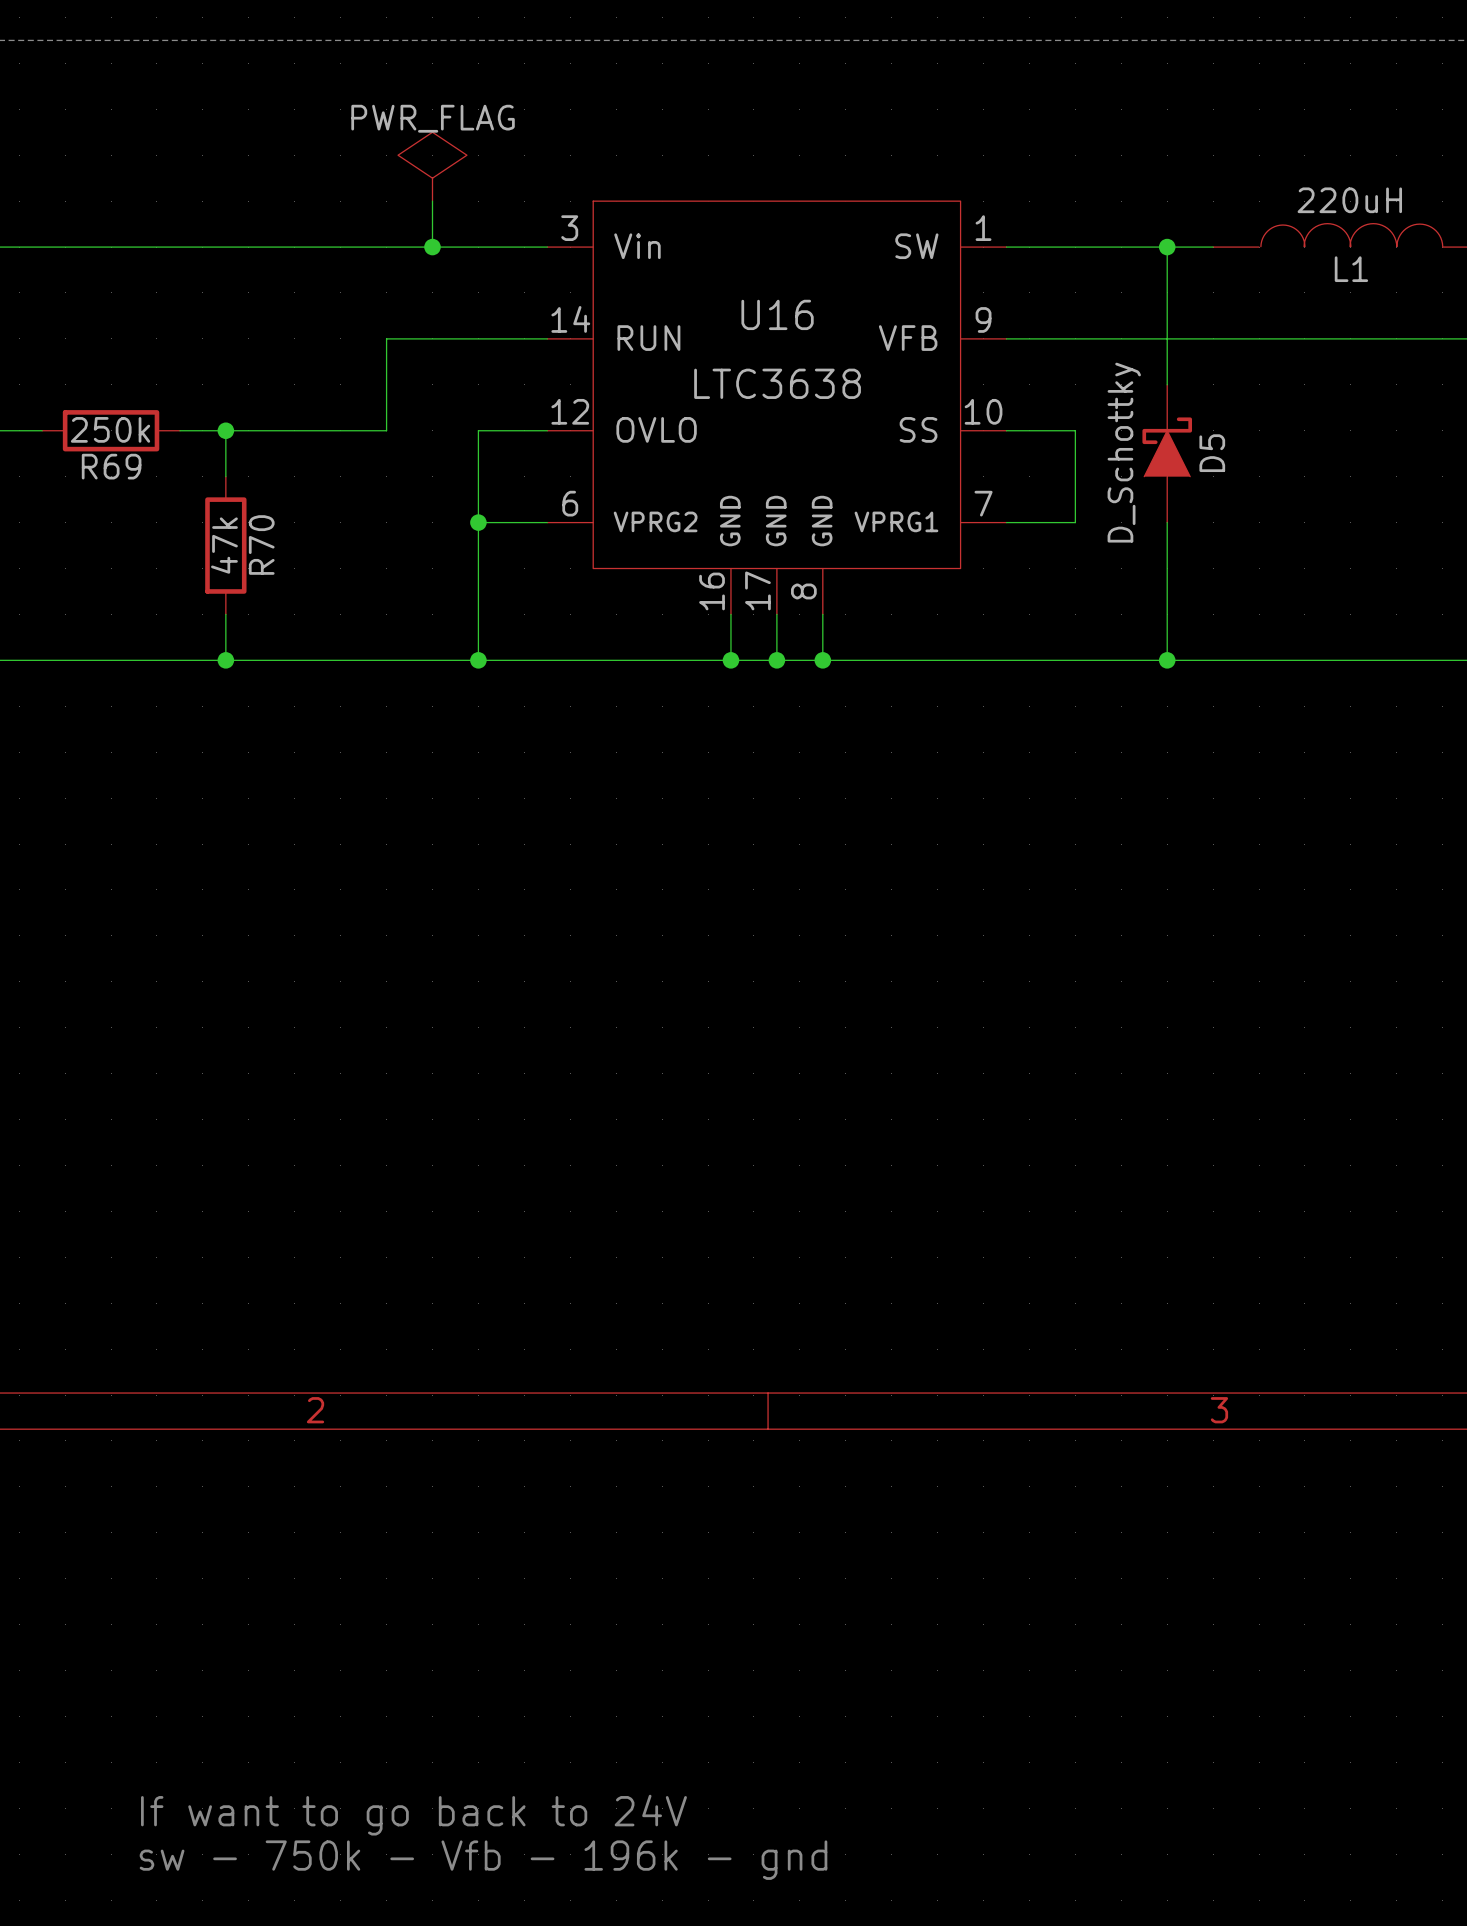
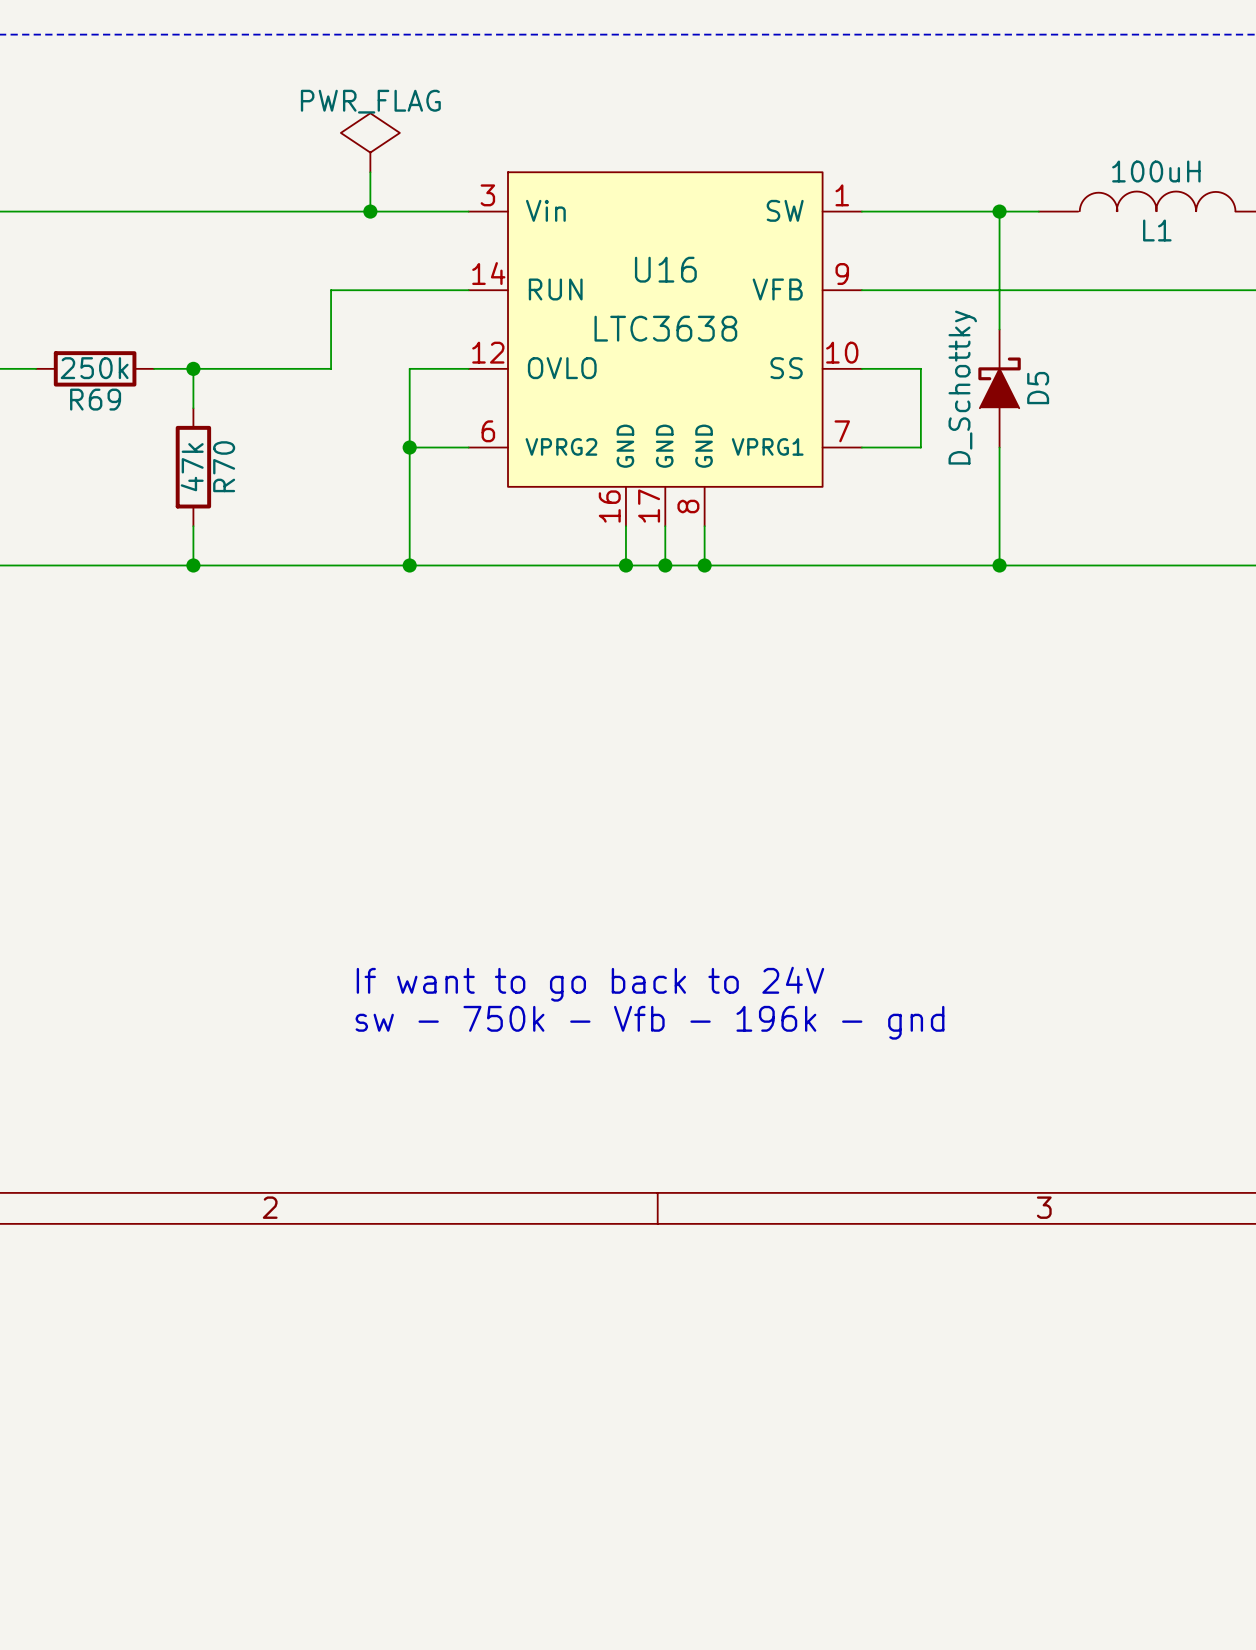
L1 value: 220uH (1349, 200) -> 100uH (1156, 171)
text: none -> If want to go back to 24V (590, 984)
text: none -> sw - 750k - Vfb - 196k - gnd (650, 1022)
text: If want to go back to 24V (413, 1815) -> none
text: sw - 750k - Vfb - 196k - gnd (483, 1860) -> none

